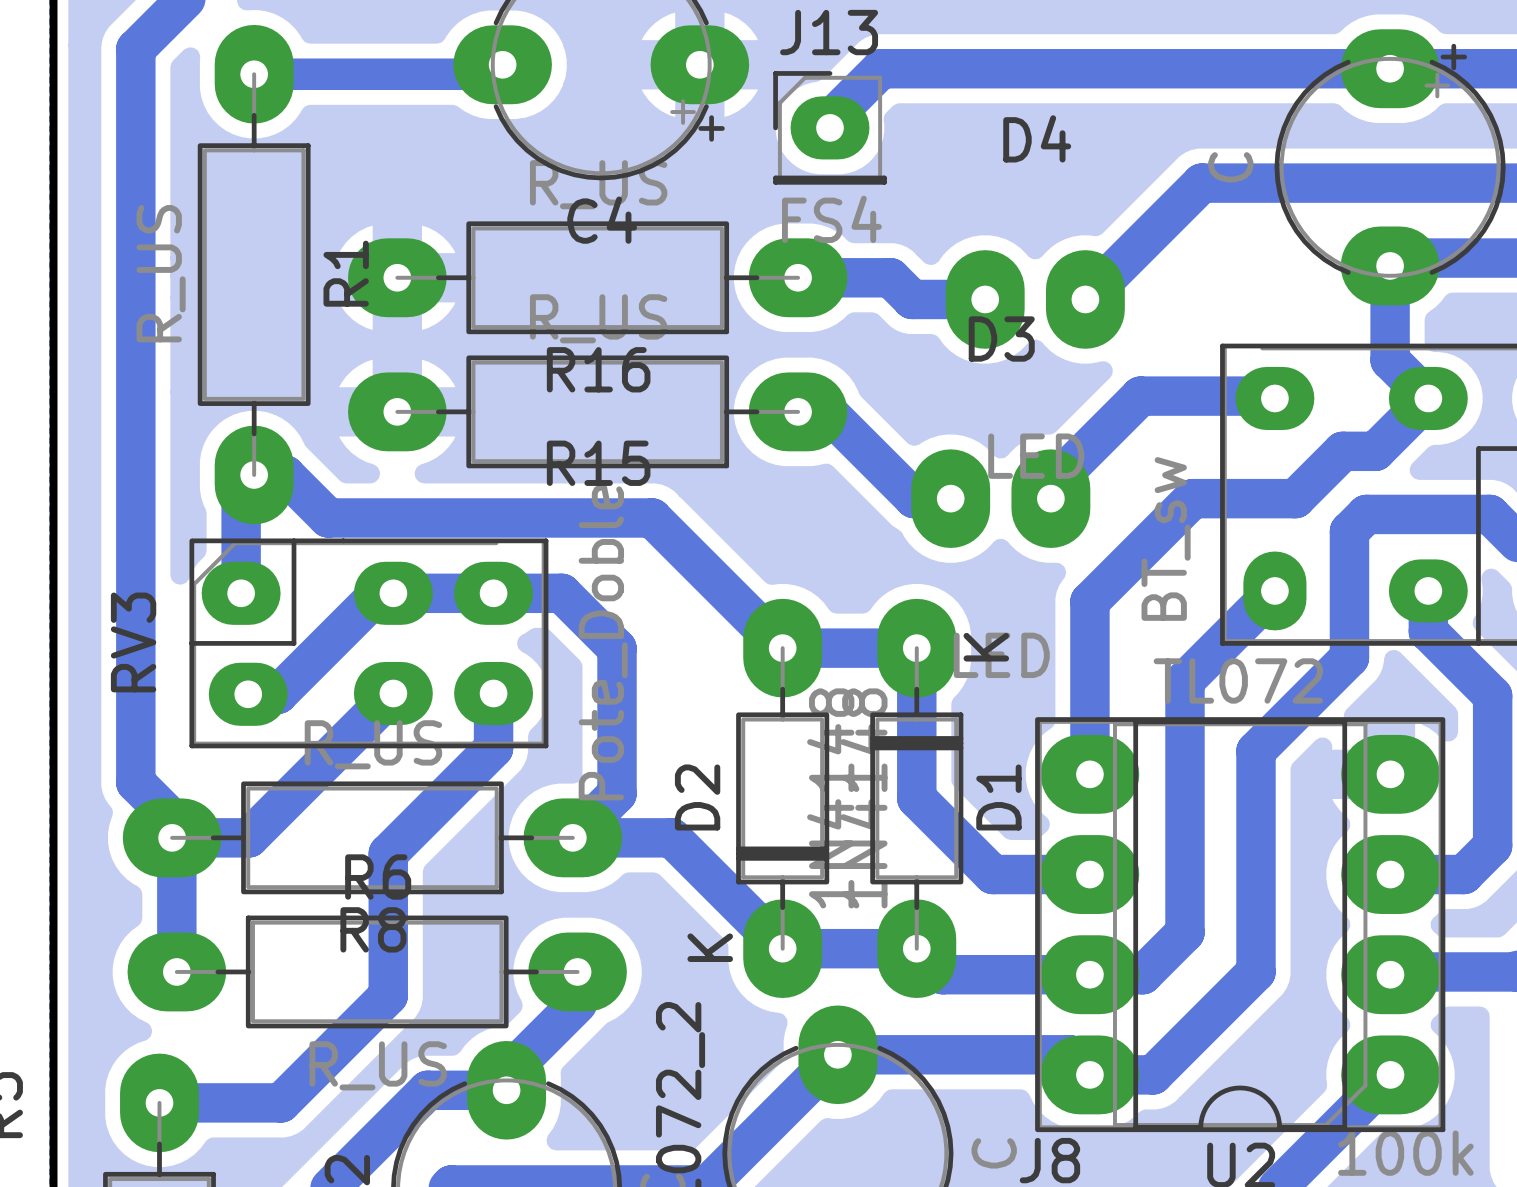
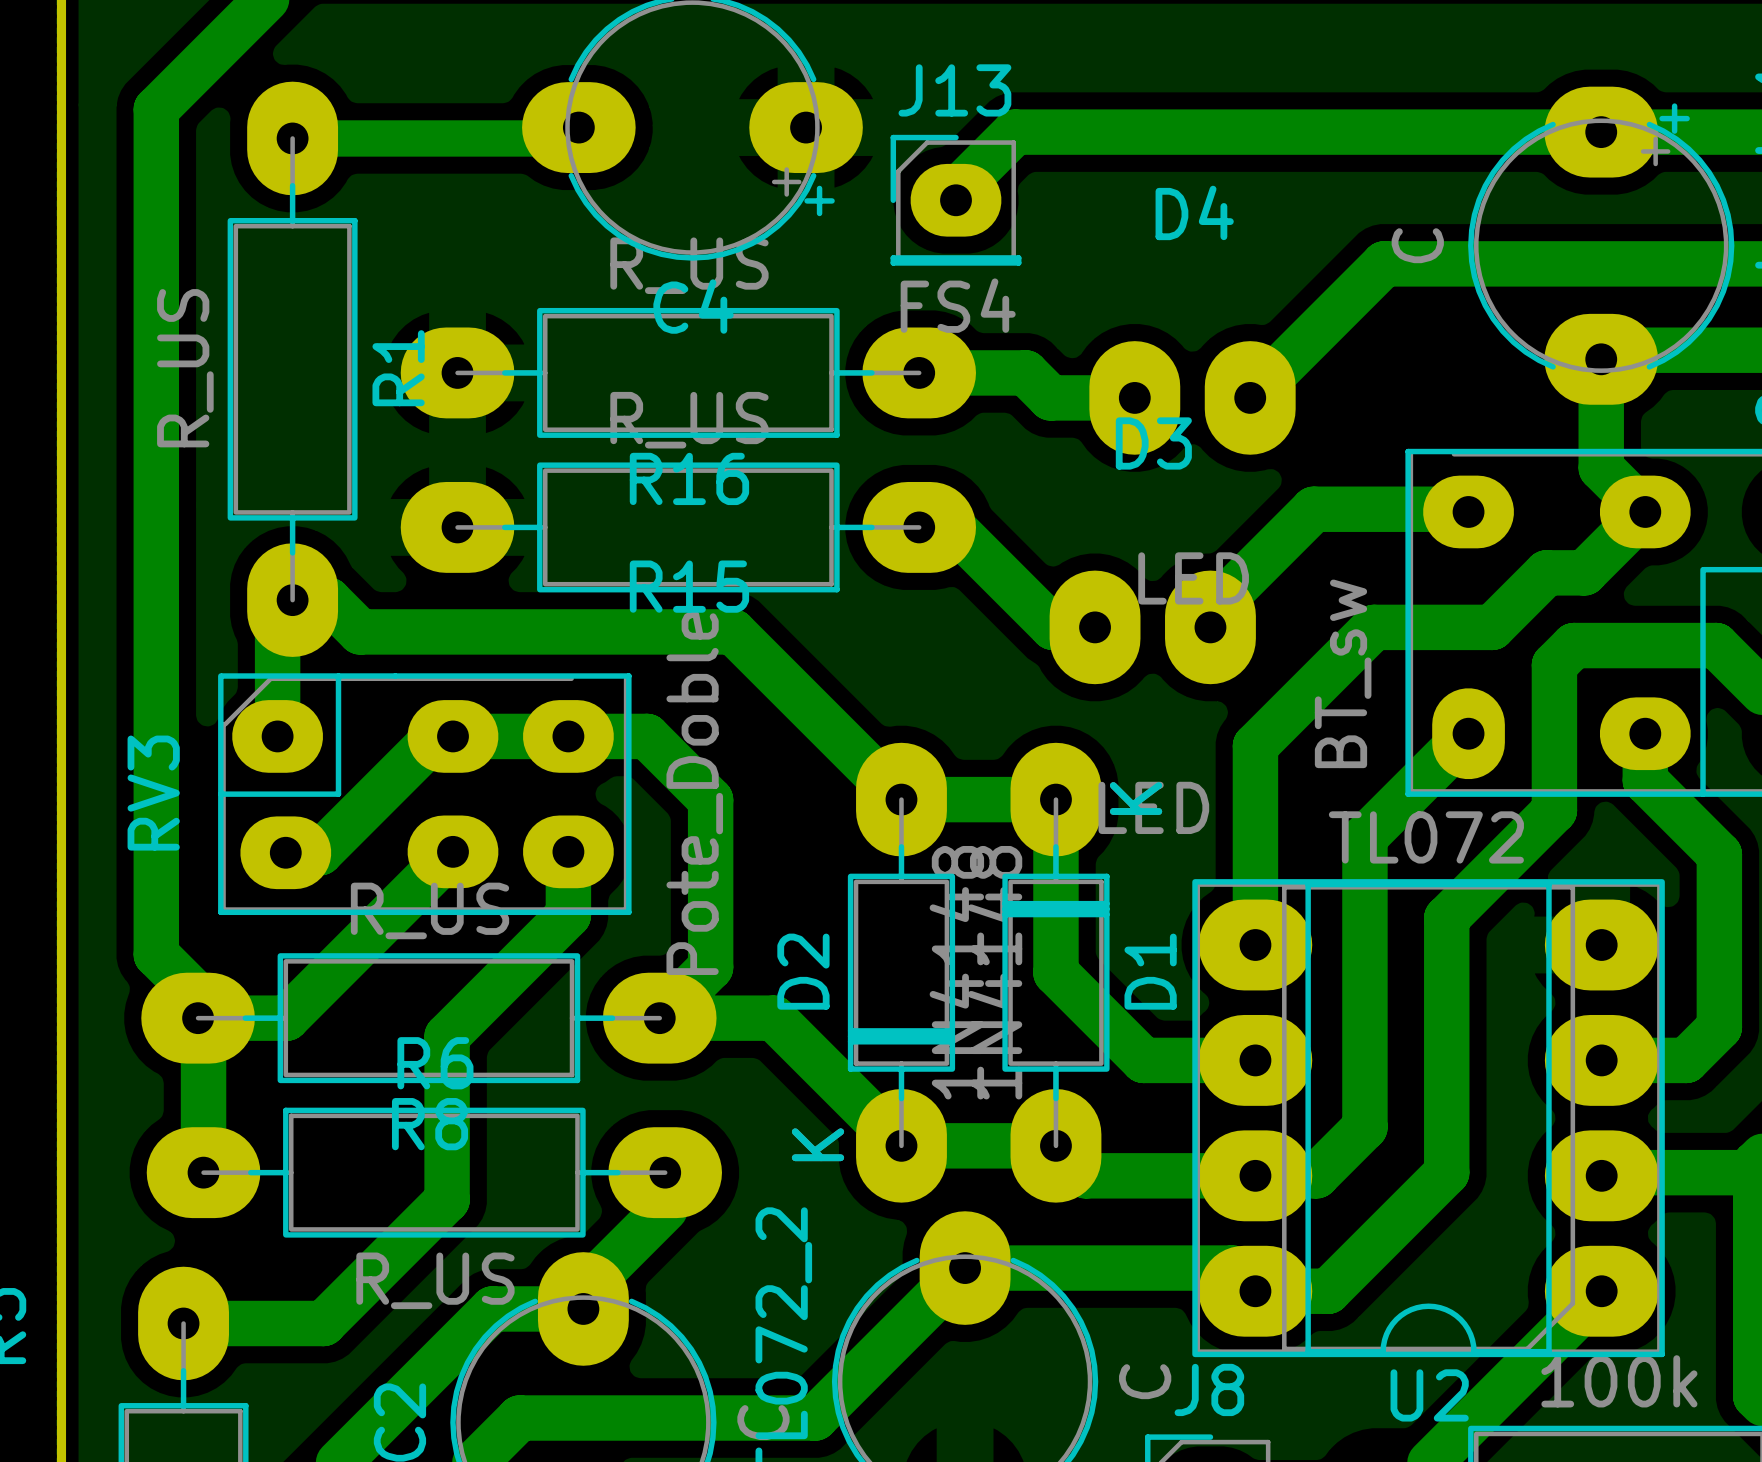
bottom track: (312, 502) (328, 517) (652, 517) -> (360, 631) (733, 631) (751, 649)

